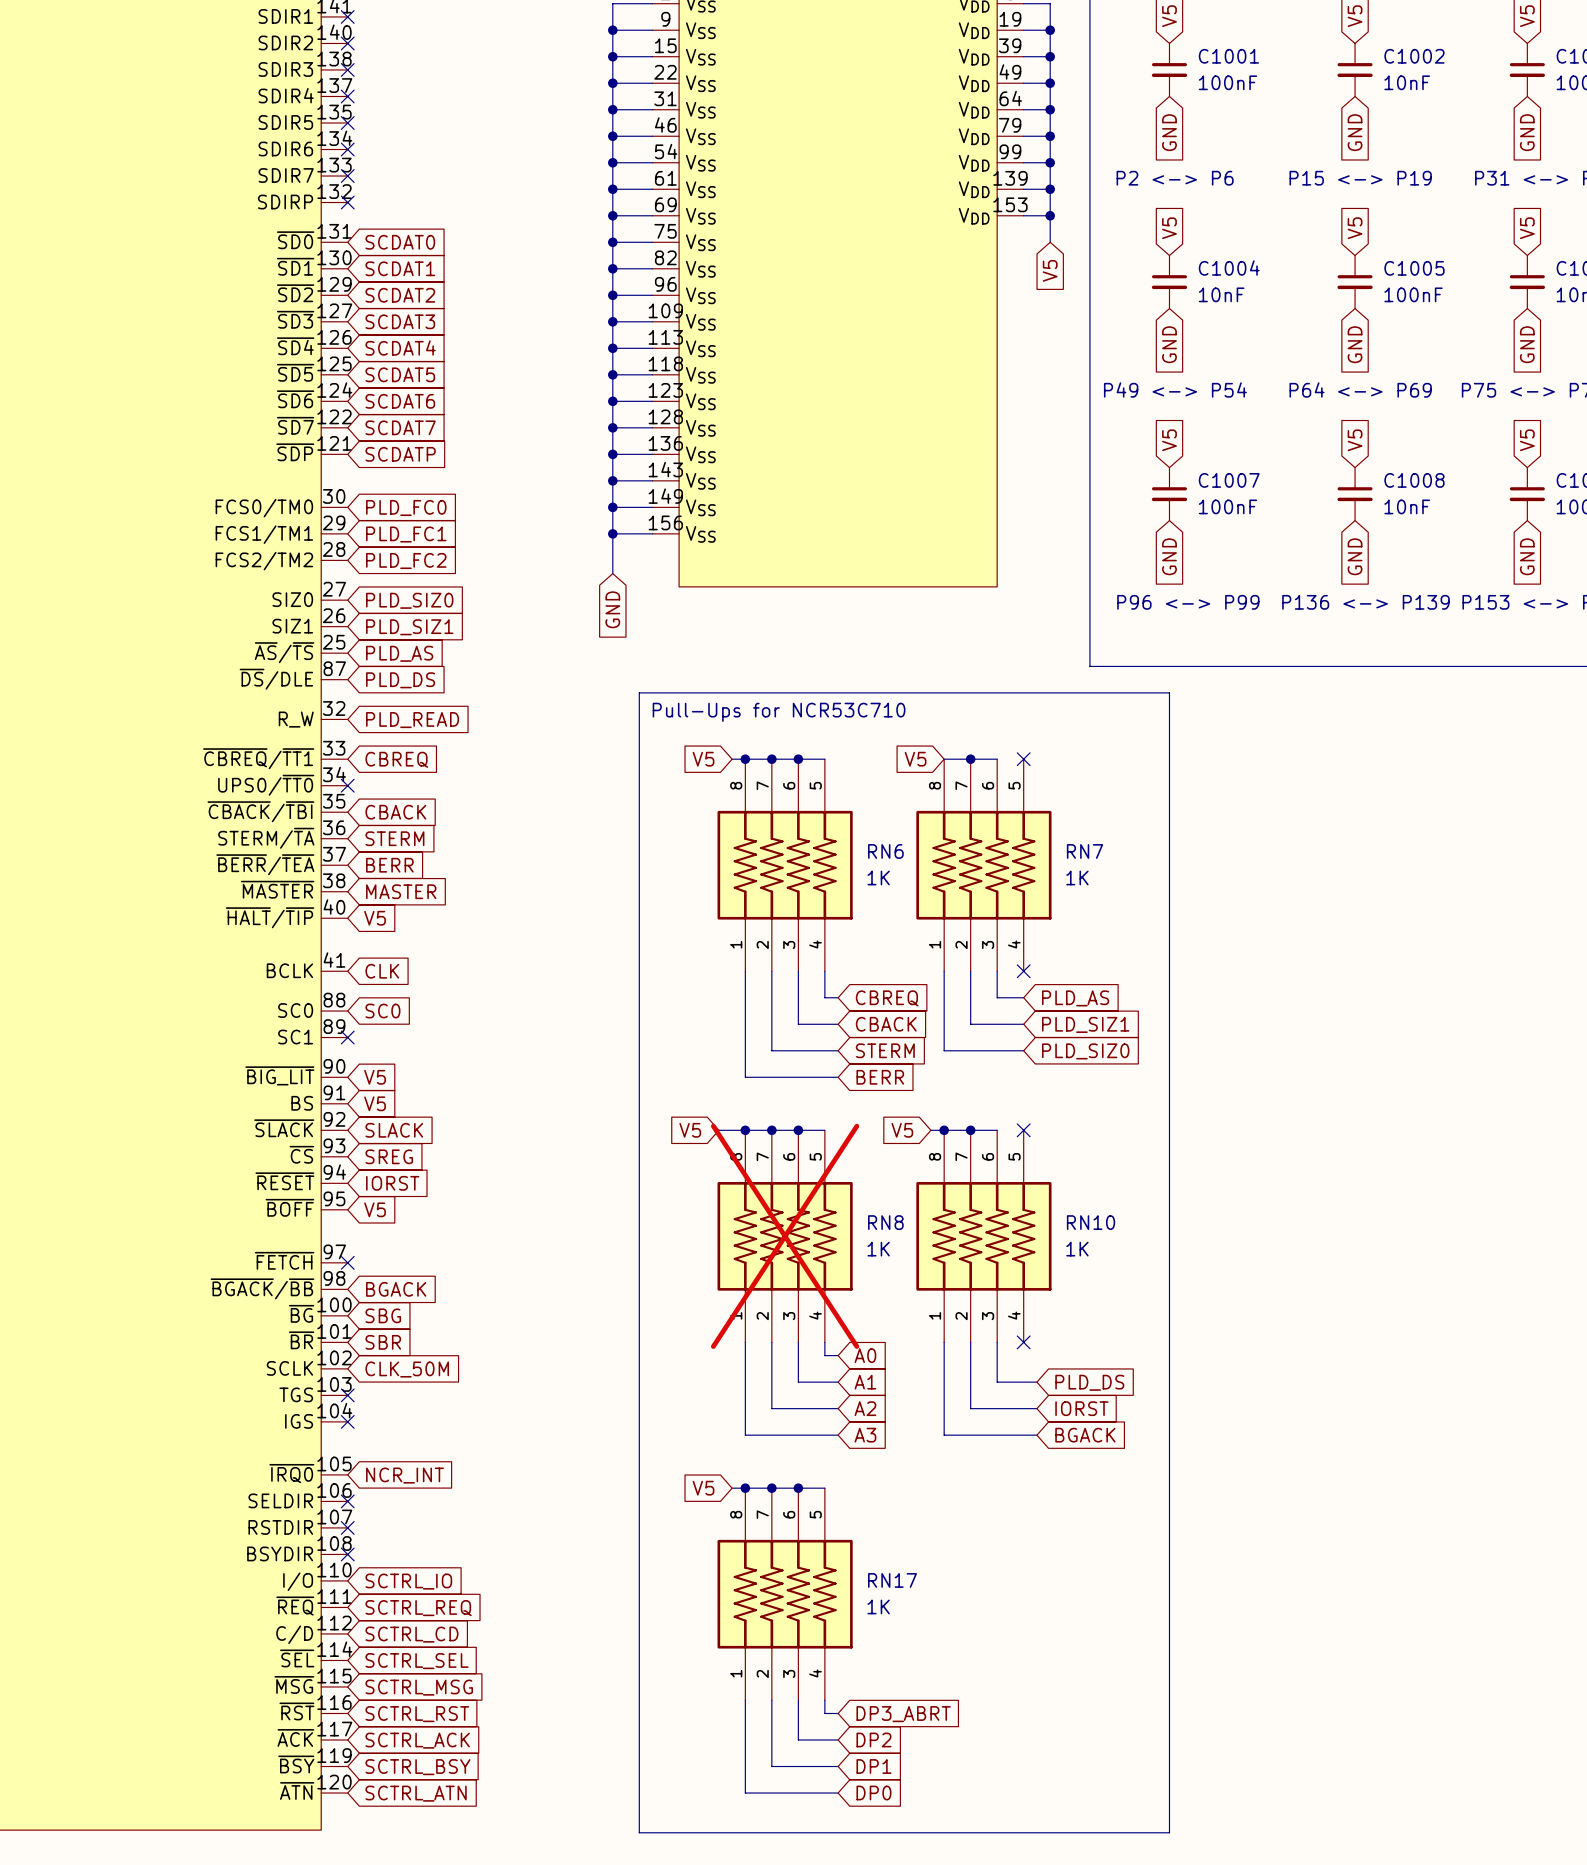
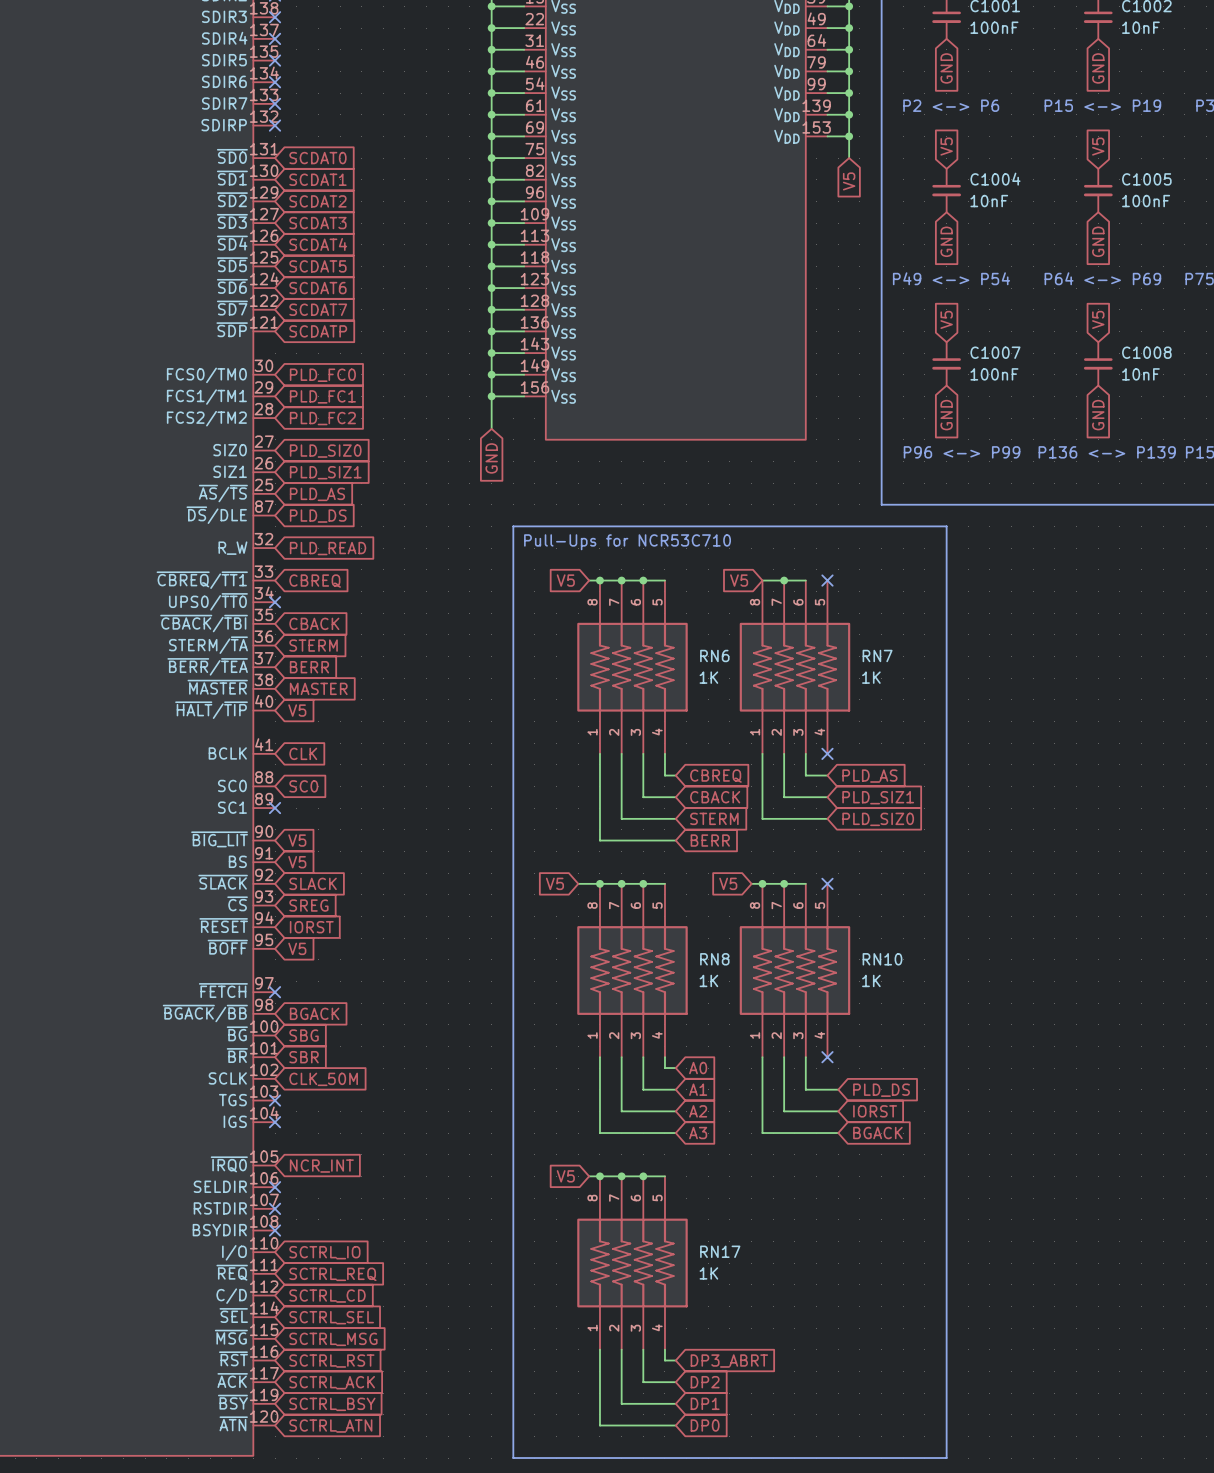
RN8 do-not-place cross: (785, 1236) -> none

